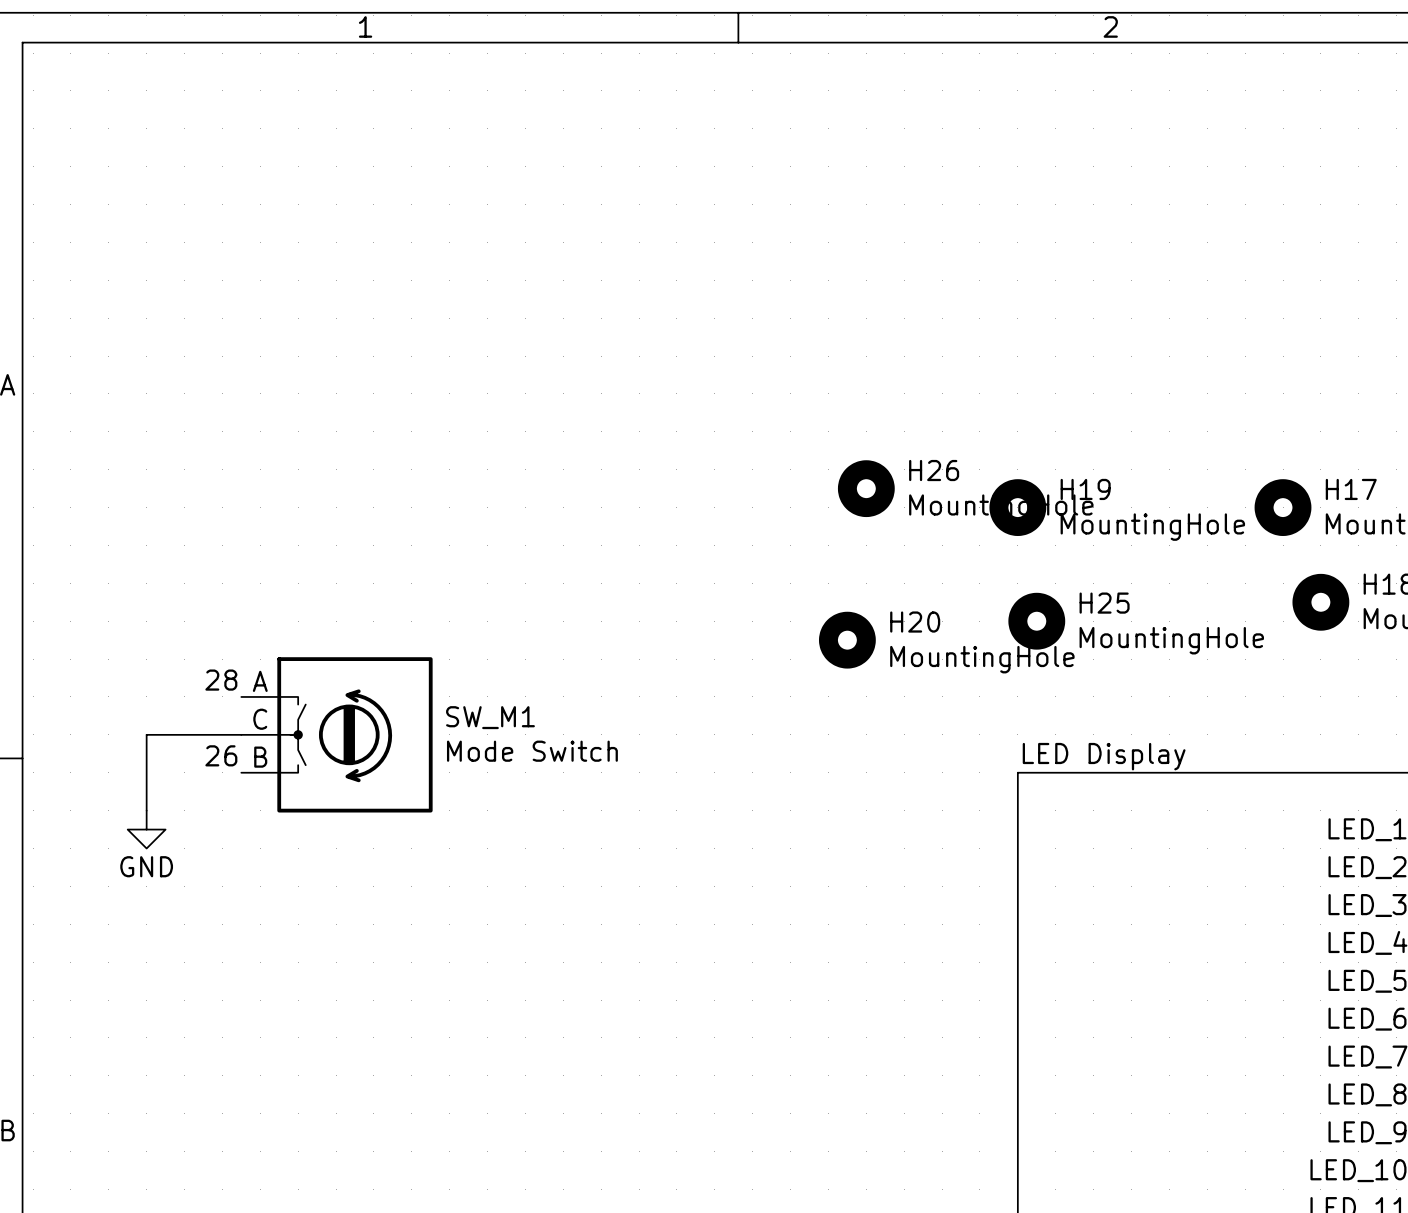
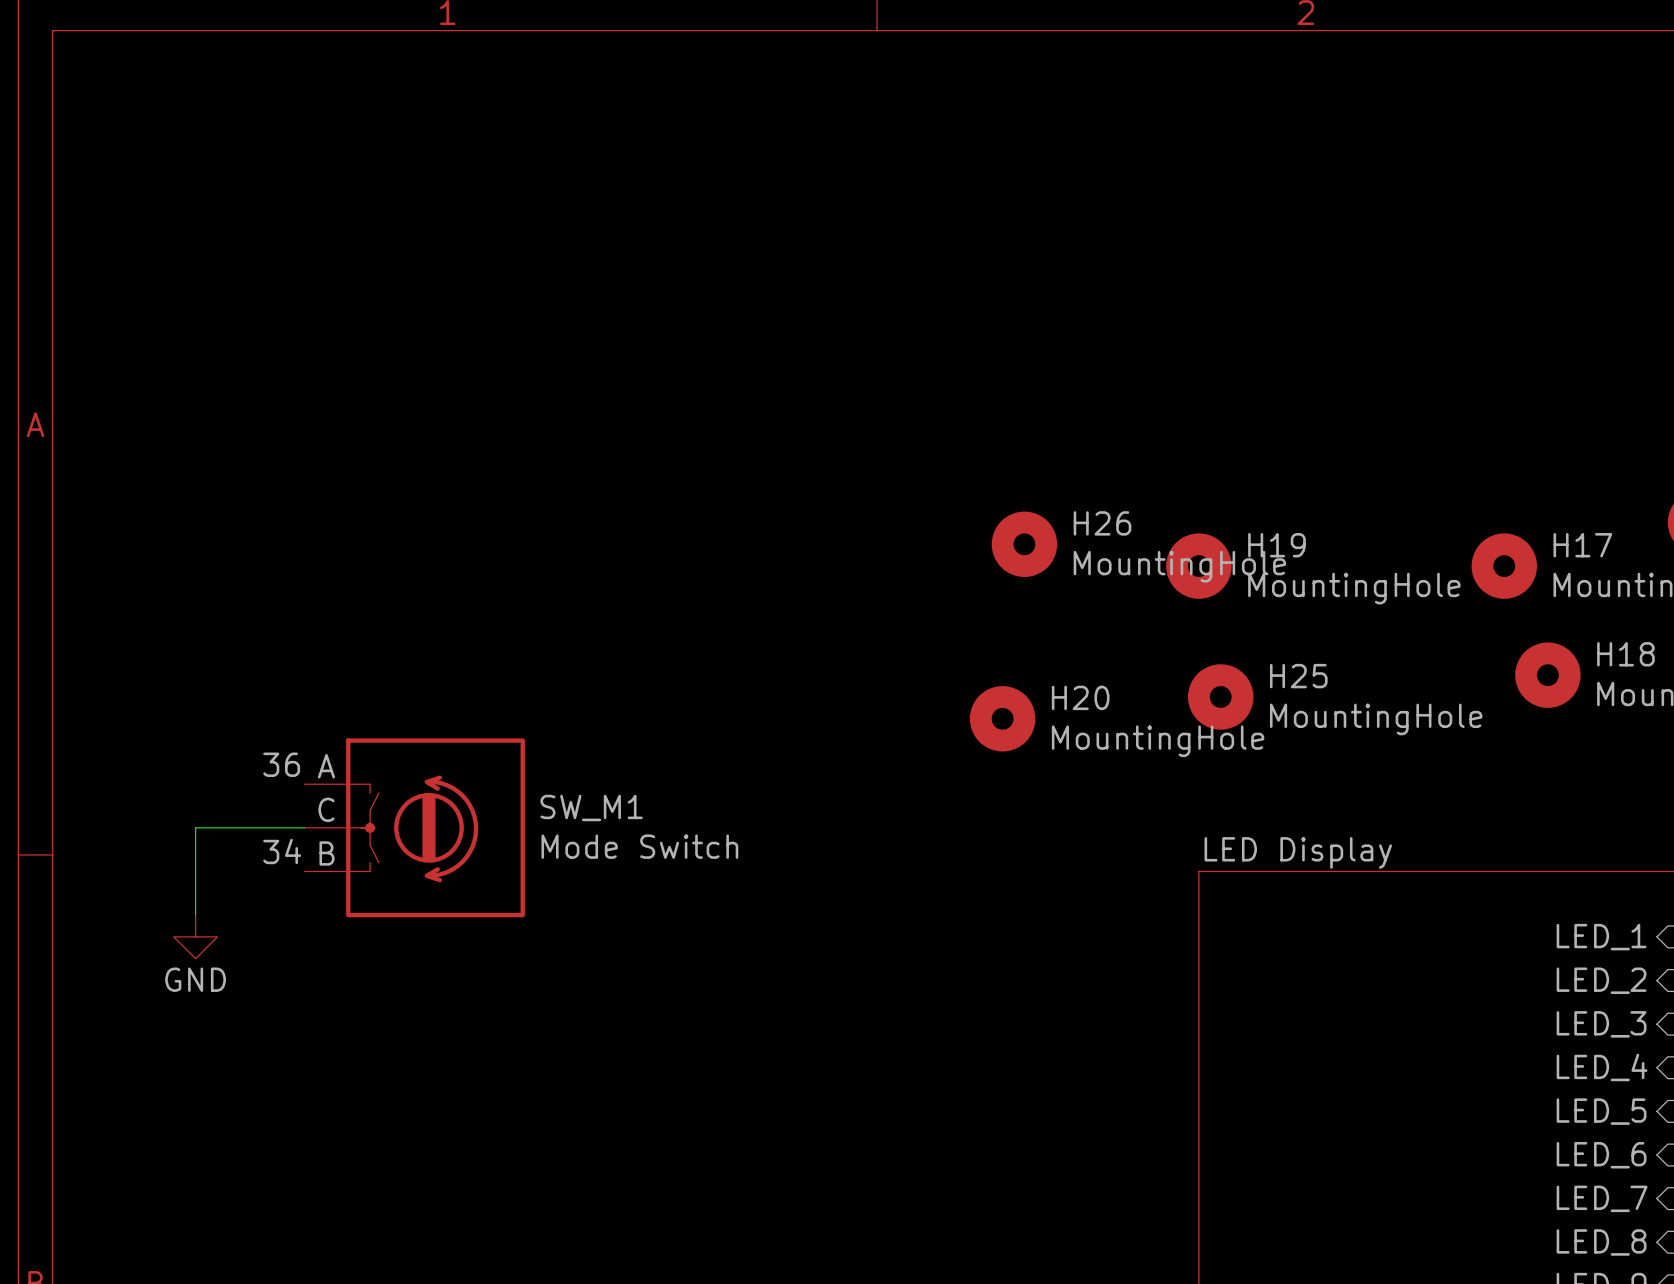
label: 28 (221, 680) -> 36 (281, 764)
label: 26 (221, 755) -> 34 (282, 851)

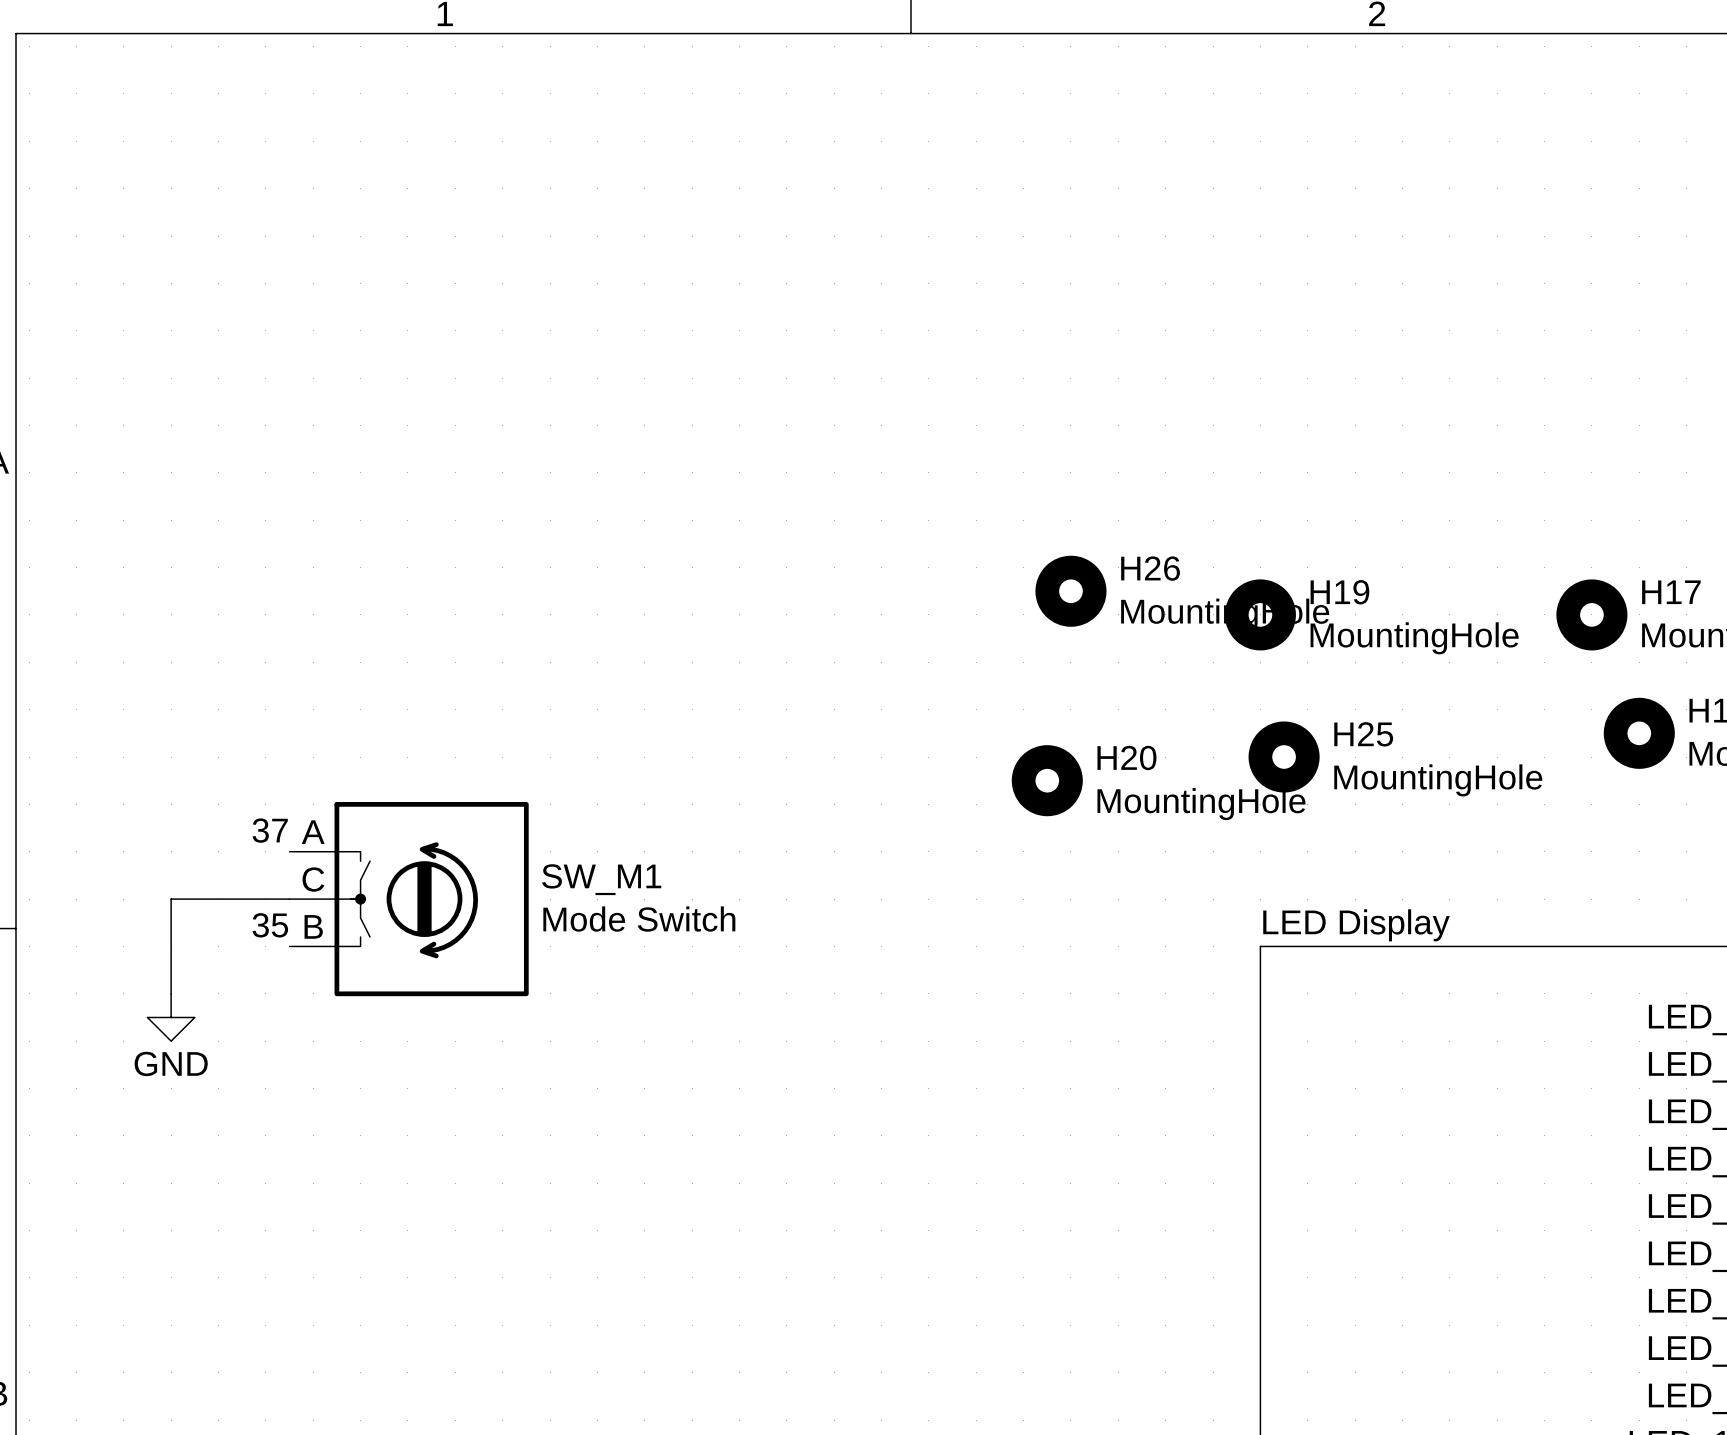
label: 36 (281, 764) -> 37 (270, 830)
label: 34 (282, 851) -> 35 (270, 925)

